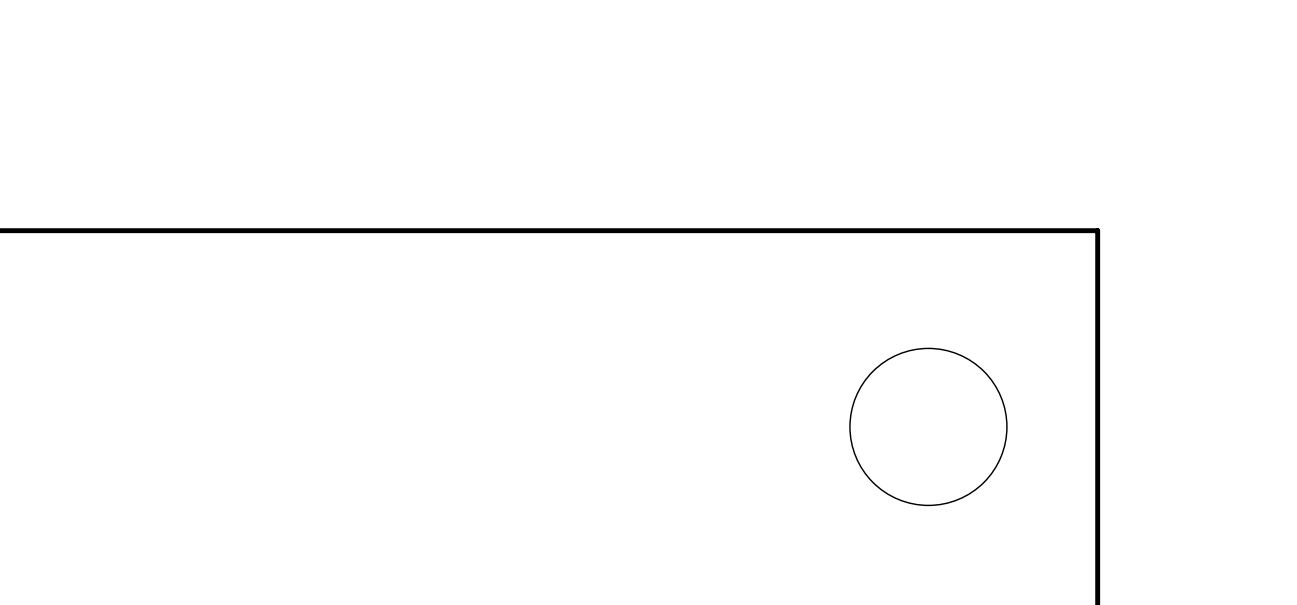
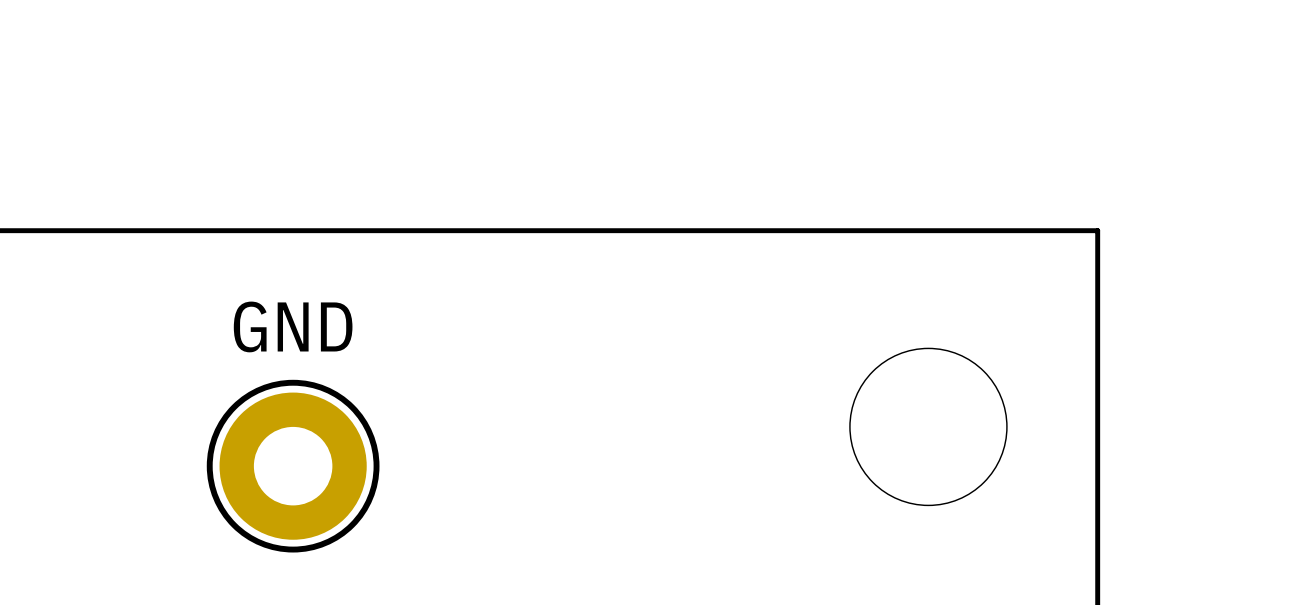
part: none -> GND (293, 466)

